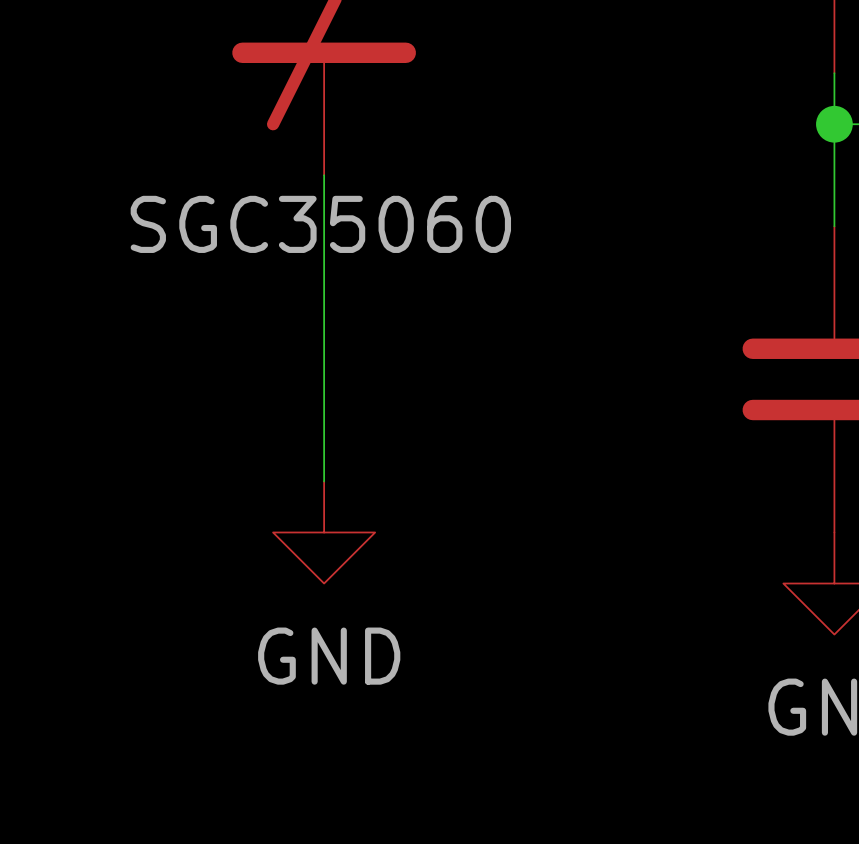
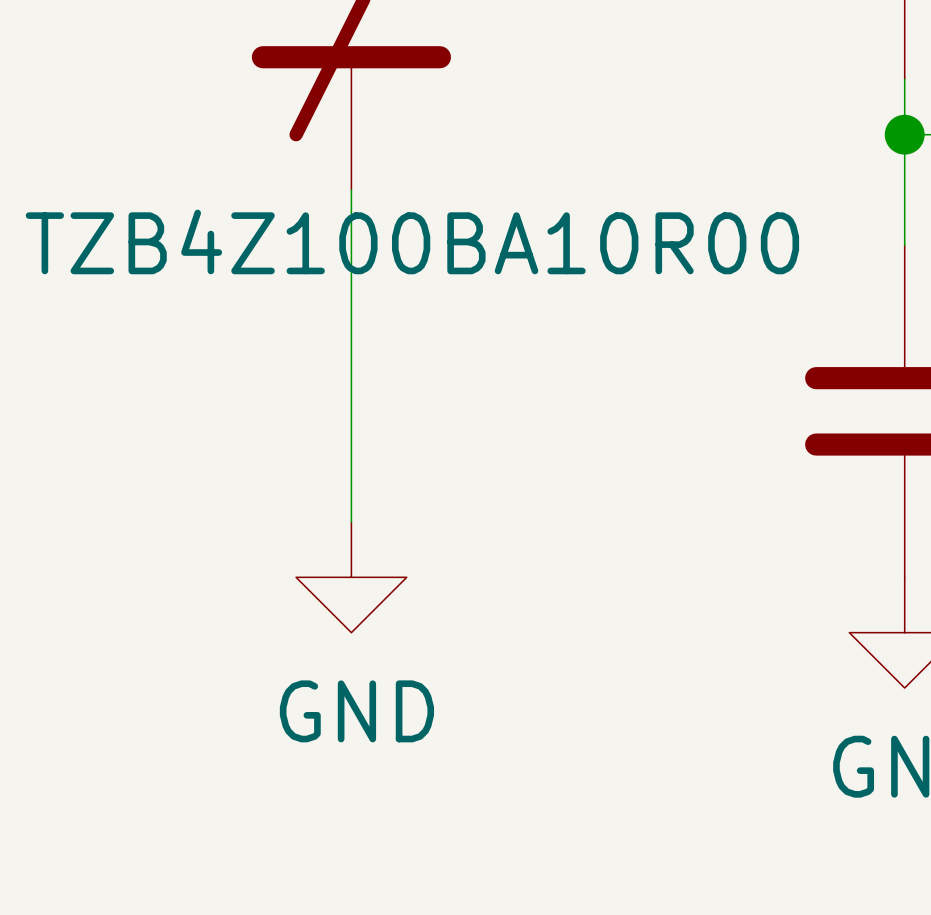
part value: SGC35060 (320, 224) -> TZB4Z100BA10R00 (412, 241)

